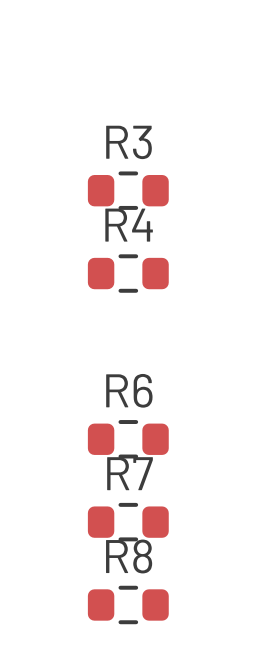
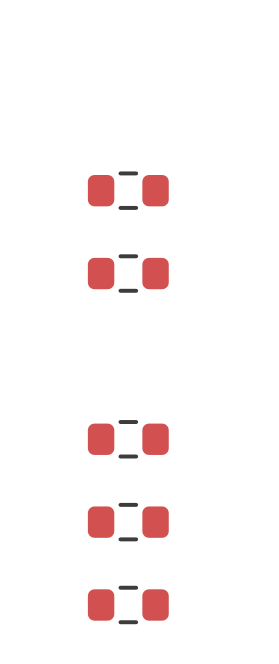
R3 name: R3 (129, 142) -> none
R4 name: R4 (129, 225) -> none
R6 name: R6 (129, 390) -> none
R7 name: R7 (130, 473) -> none
R8 name: R8 (129, 556) -> none

